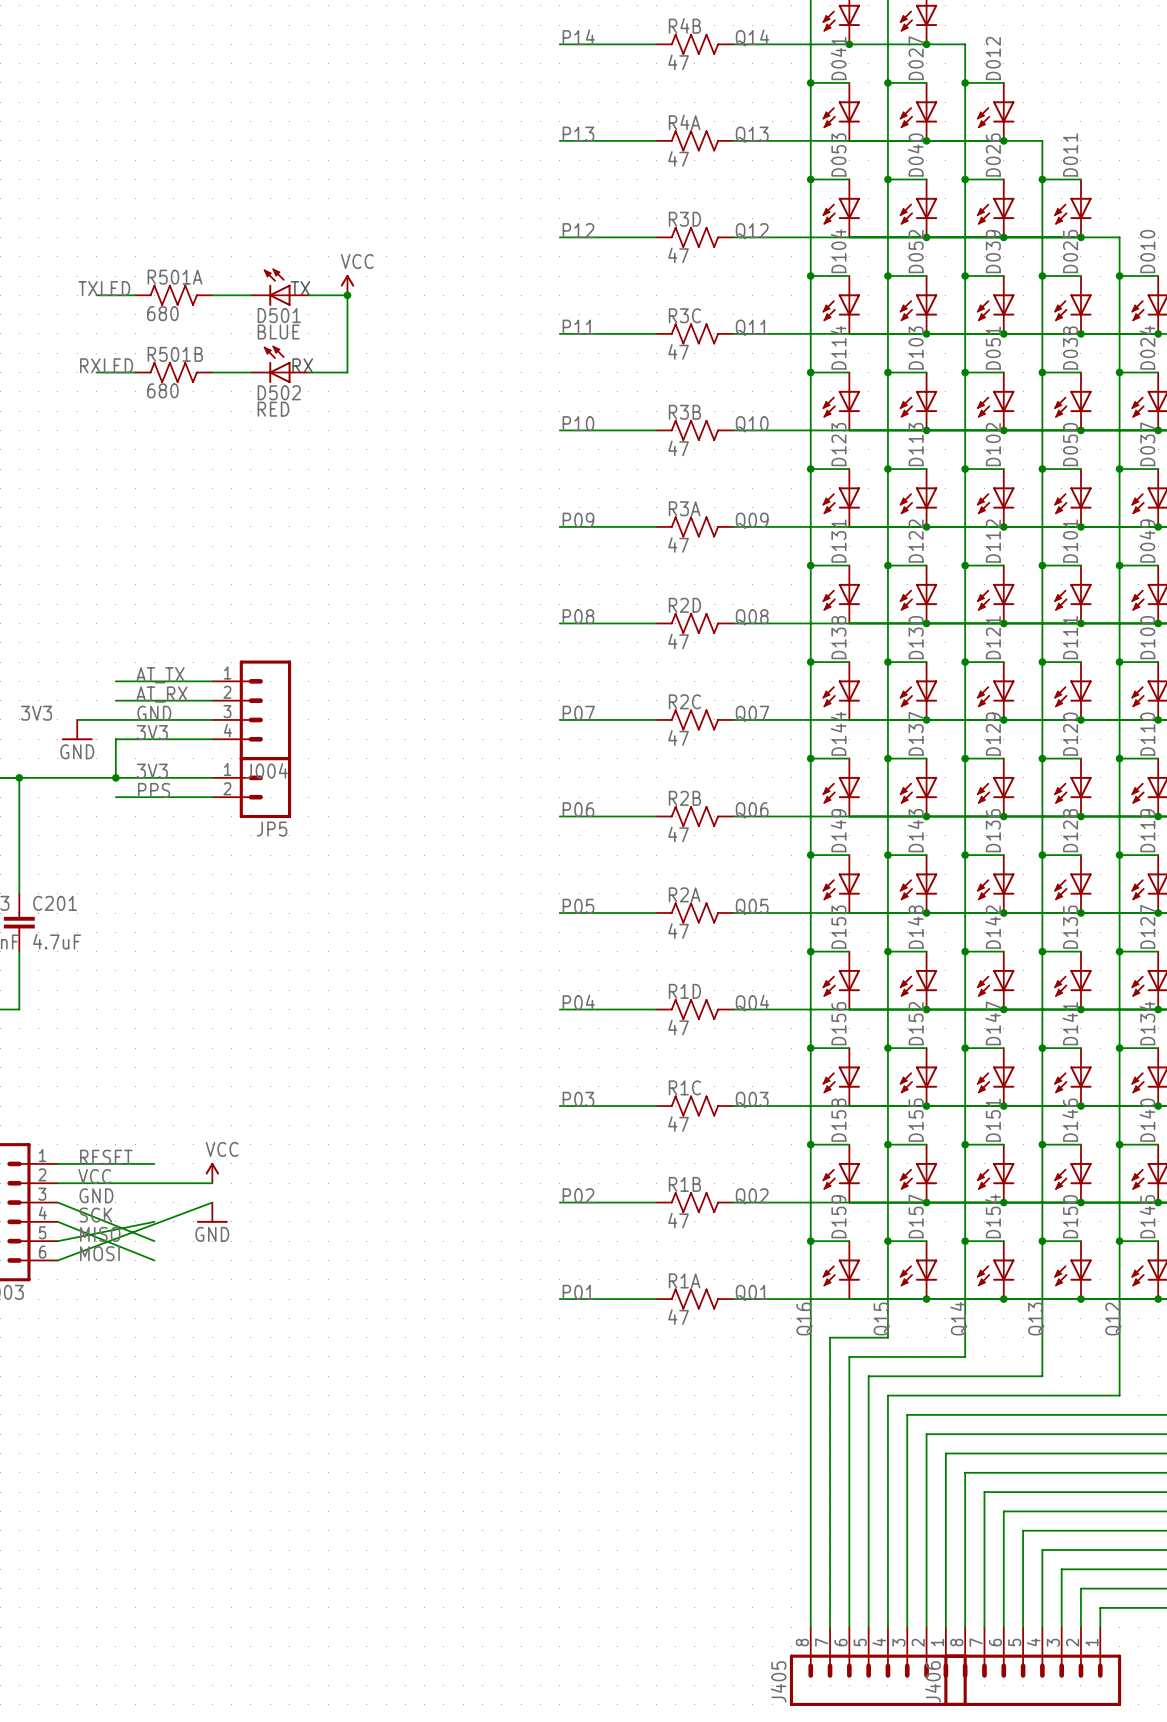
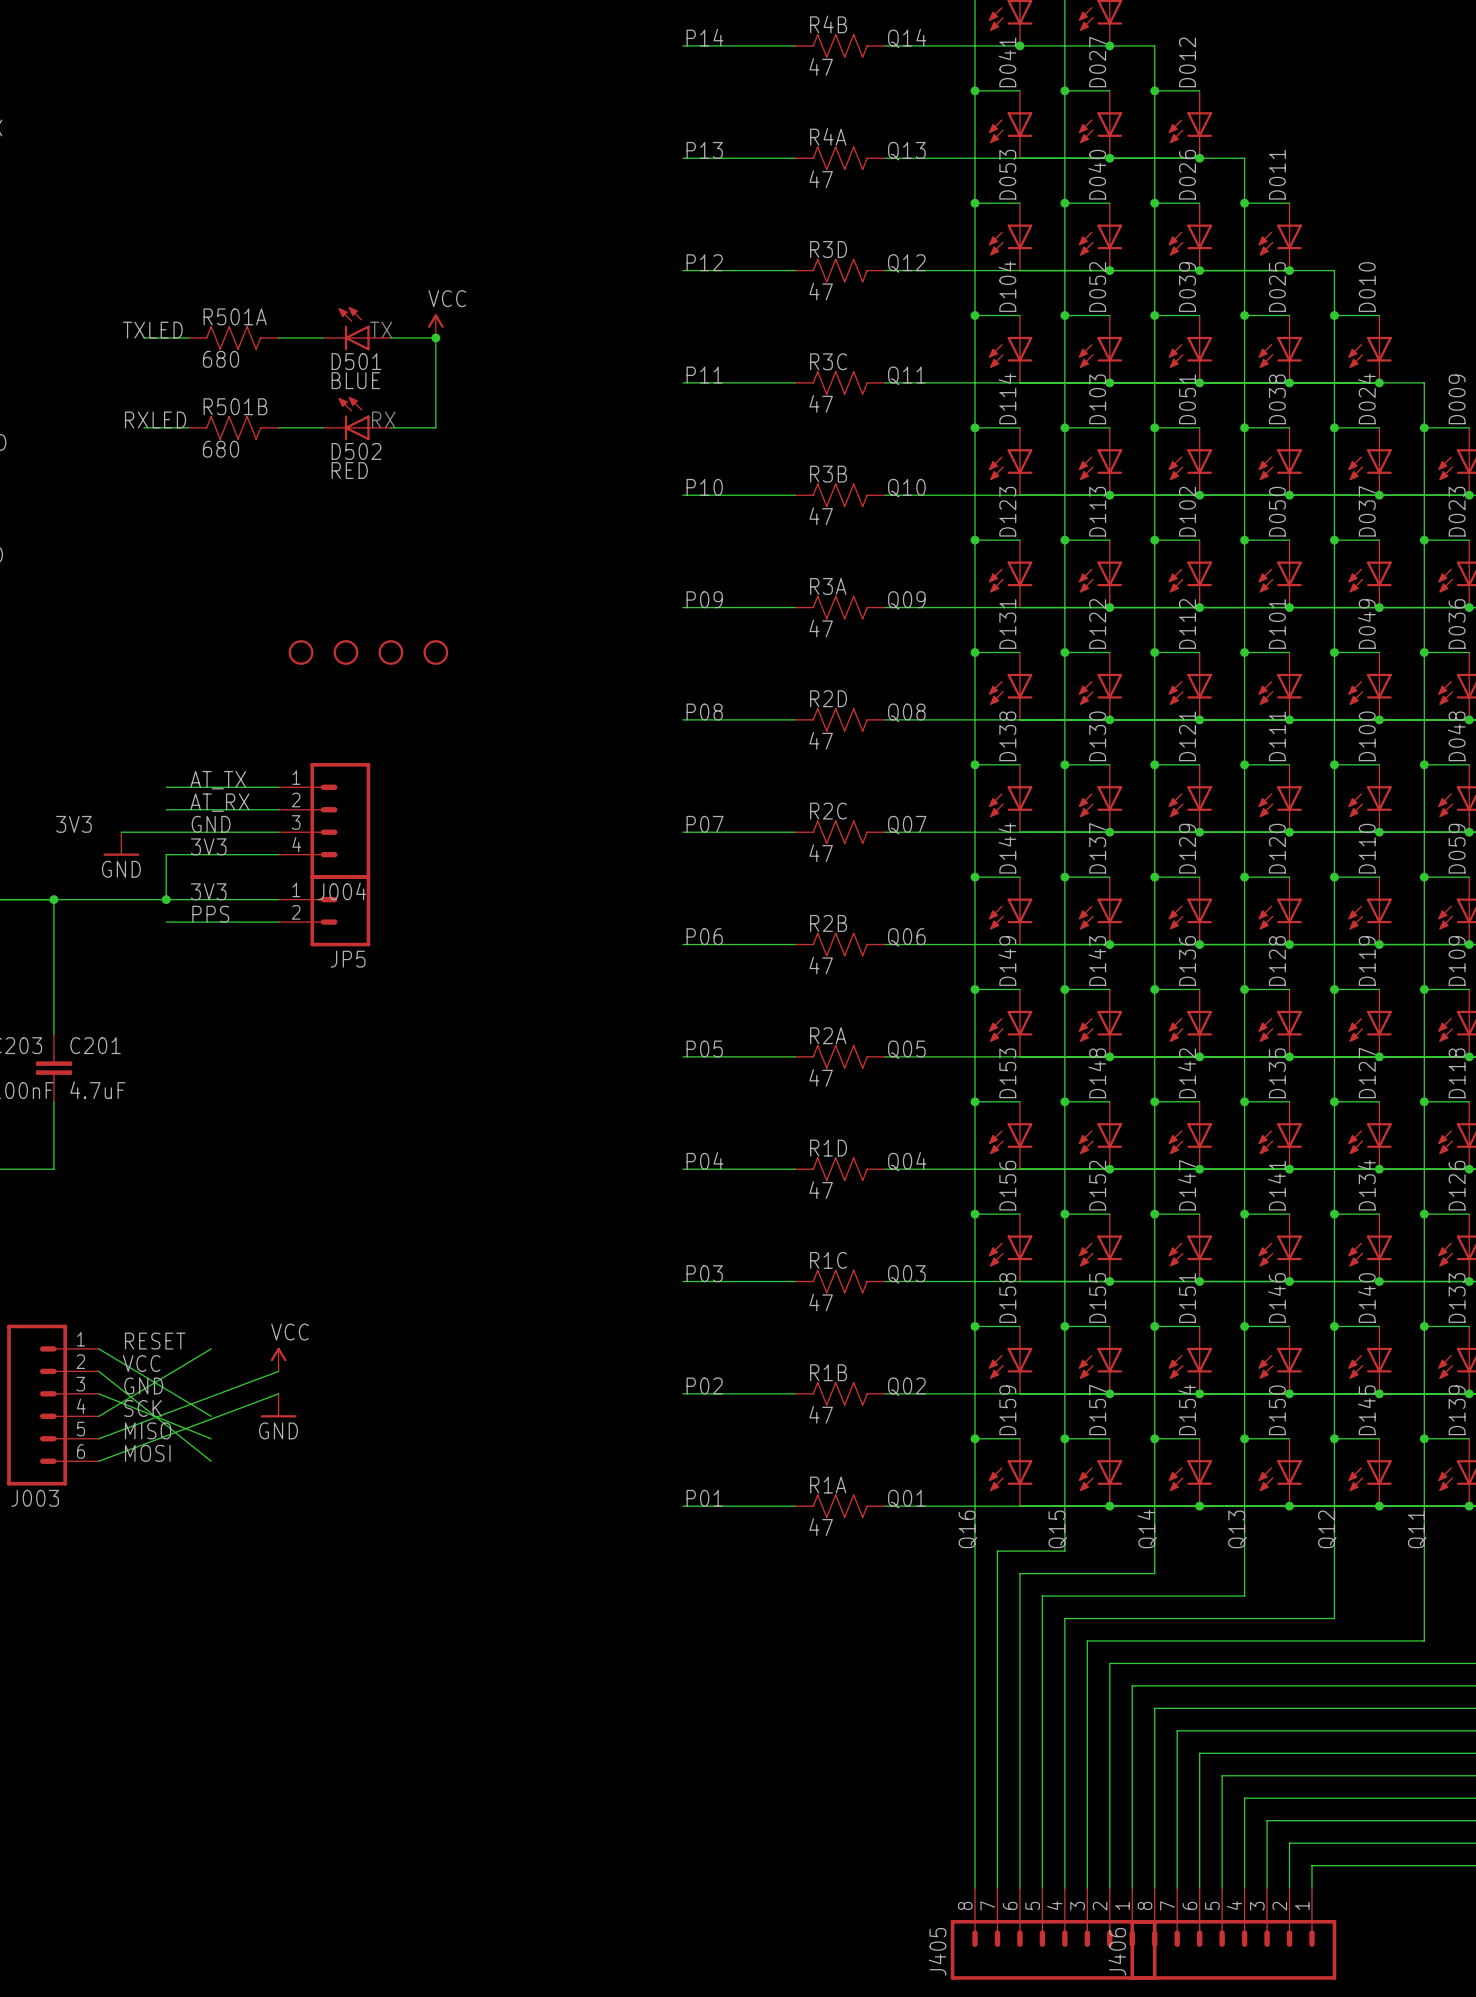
part: none -> (301, 652)
part: none -> (345, 652)
part: none -> (390, 652)
part: none -> (435, 652)
wire: (57, 1163) (154, 1163) -> (98, 1348) (211, 1416)
wire: none -> (211, 1348) (98, 1416)
wire: (57, 1183) (212, 1183) -> (98, 1438) (278, 1371)
wire: (57, 1221) (154, 1260) -> (98, 1371) (211, 1461)
wire: (154, 1221) (57, 1241) -> none

